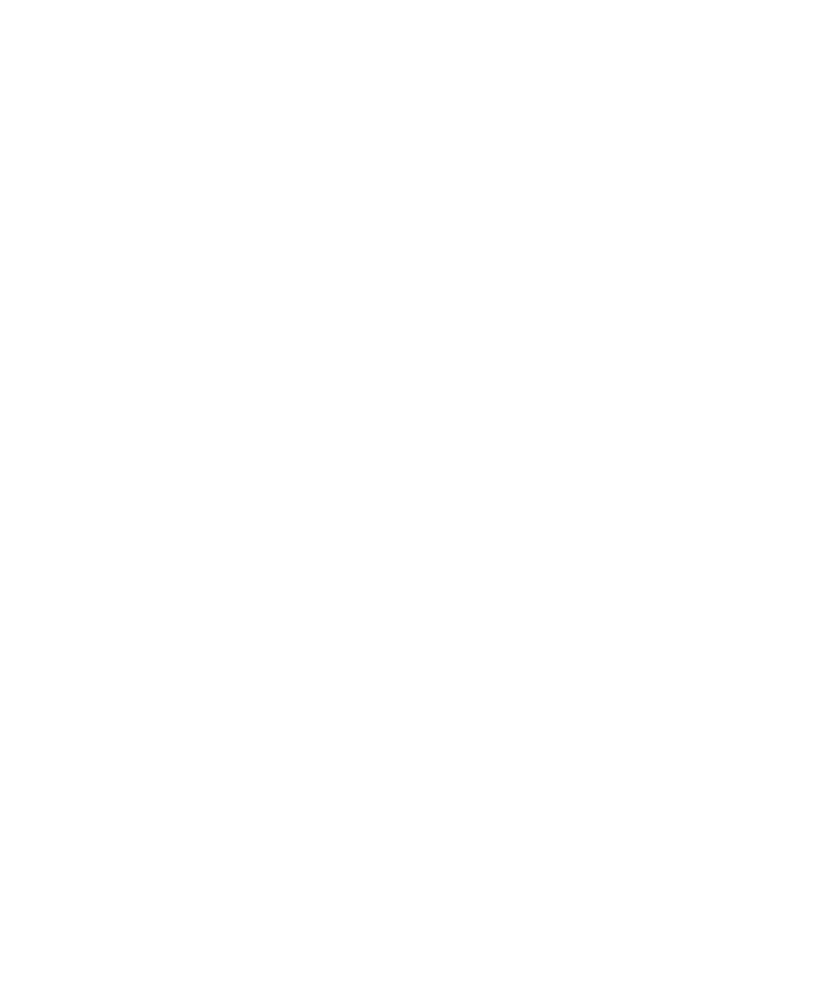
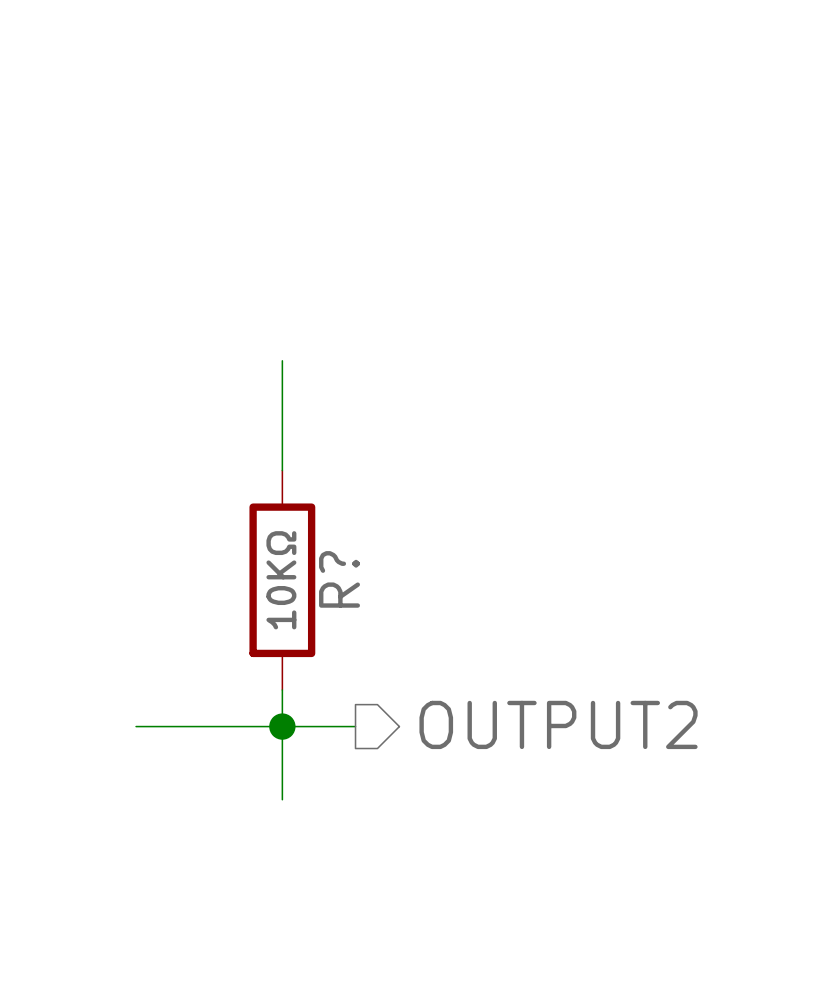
wire: none -> (282, 360) (282, 470)
R?: none -> 10KΩ (282, 580)
wire: none -> (282, 690) (282, 799)
hierarchical label: none -> OUTPUT2 (558, 724)
wire: none -> (136, 726) (355, 726)
junction: none -> (282, 726)

